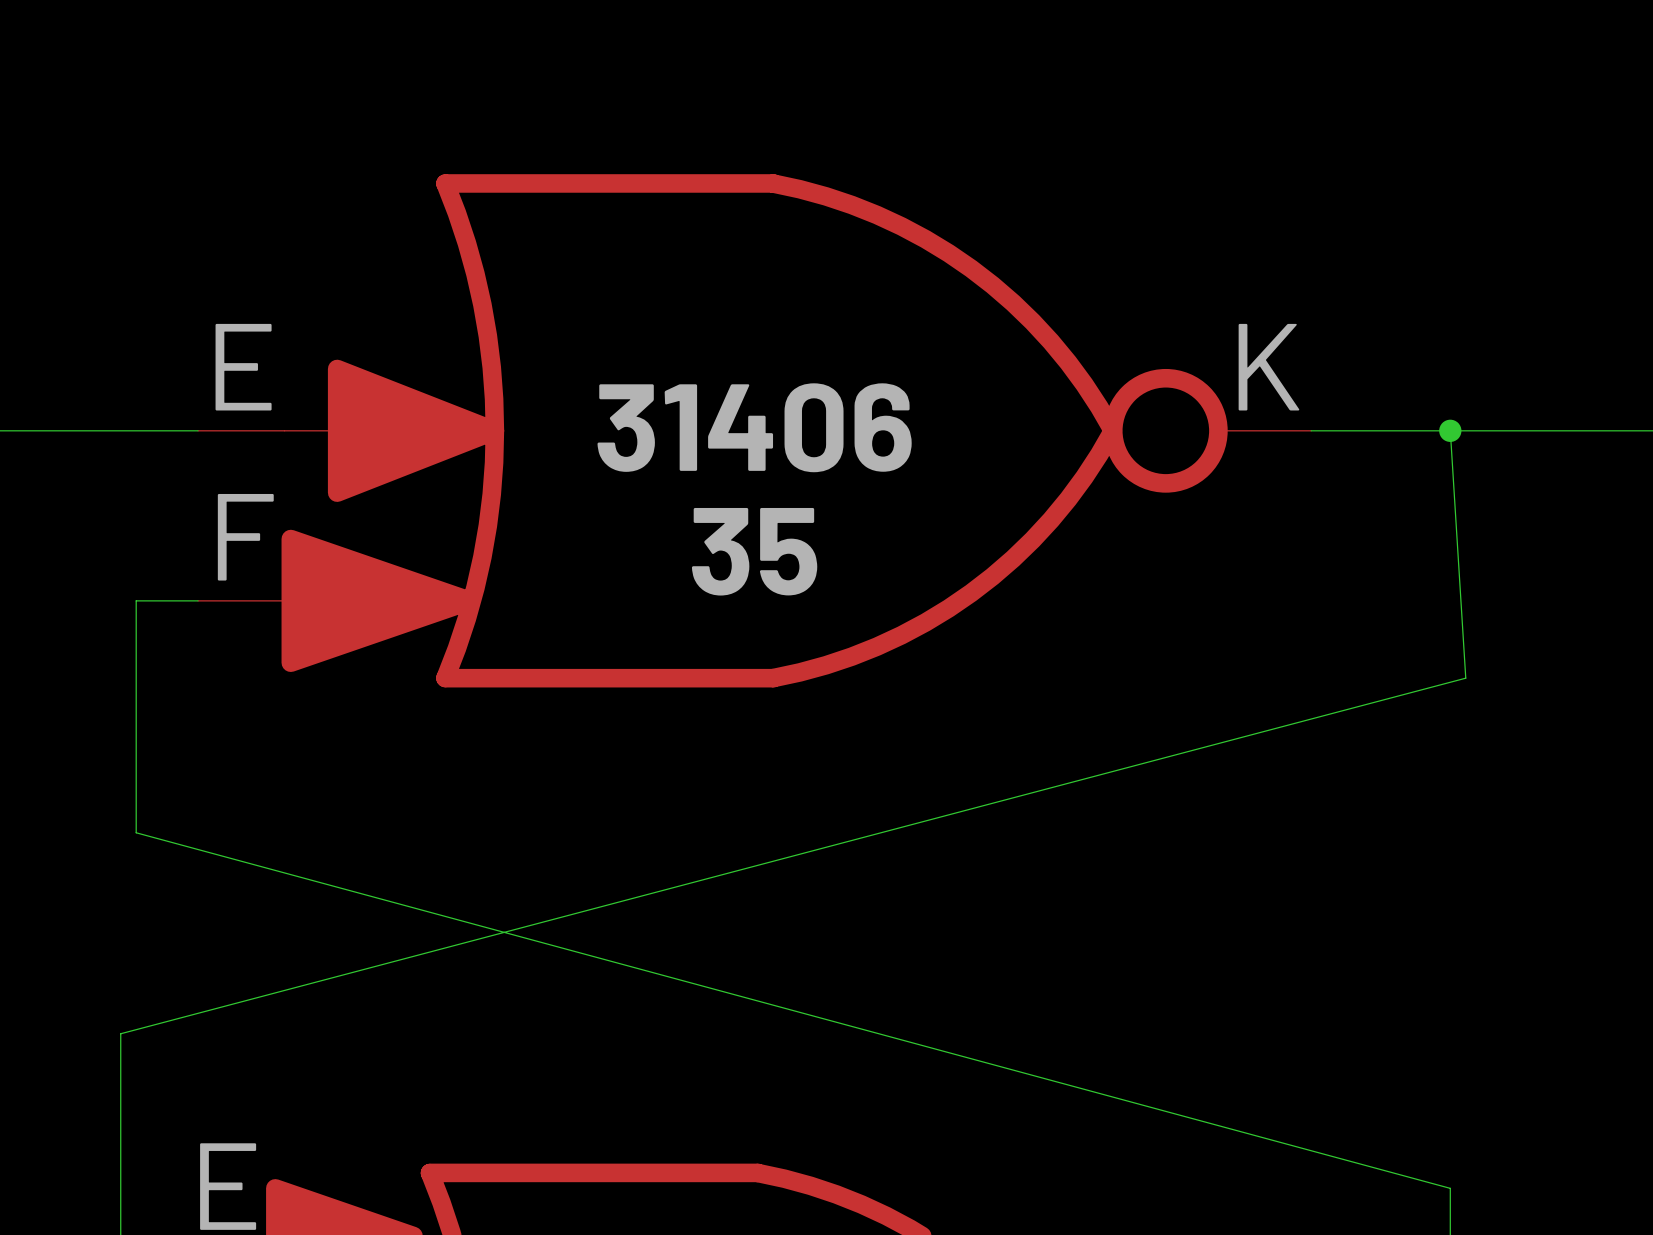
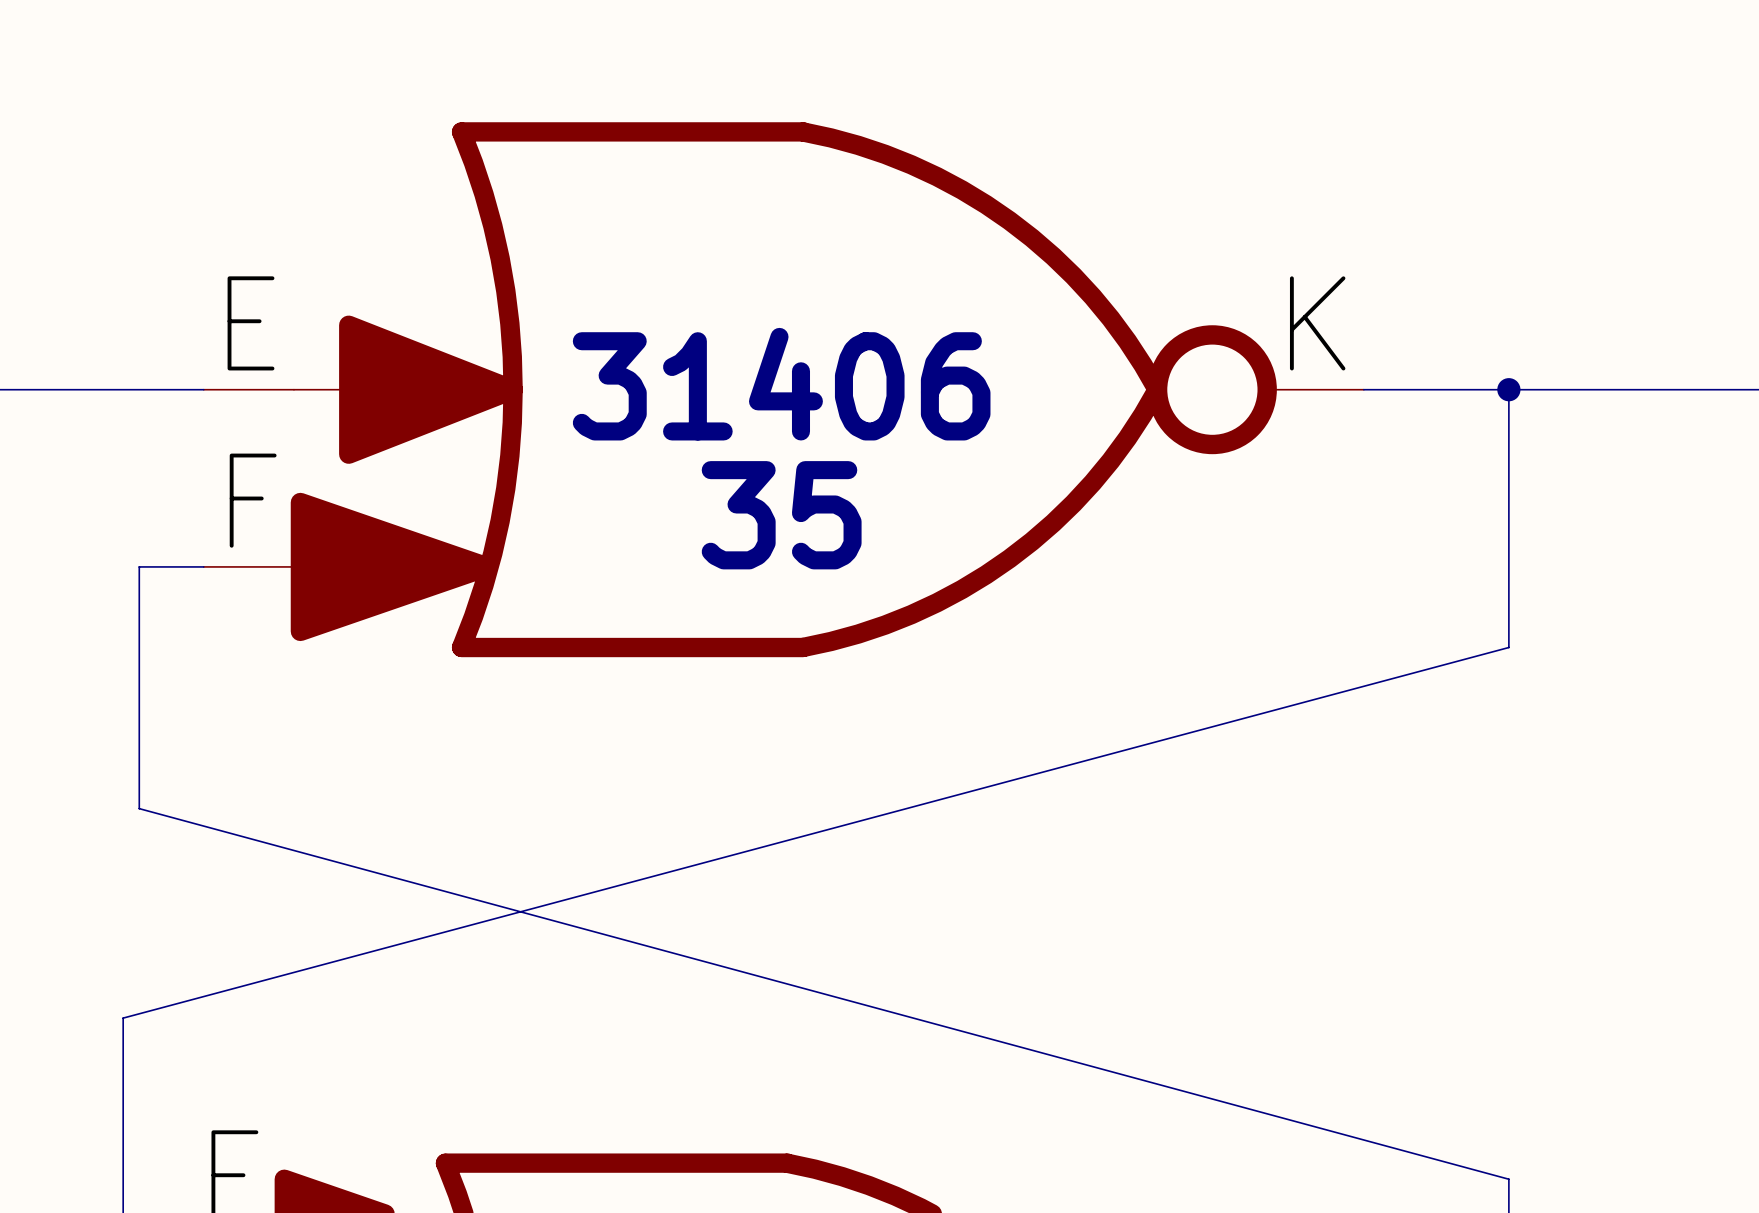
wire: (1450, 430) (1465, 678) (120, 1033) -> (1508, 389) (1508, 647) (123, 1018)

